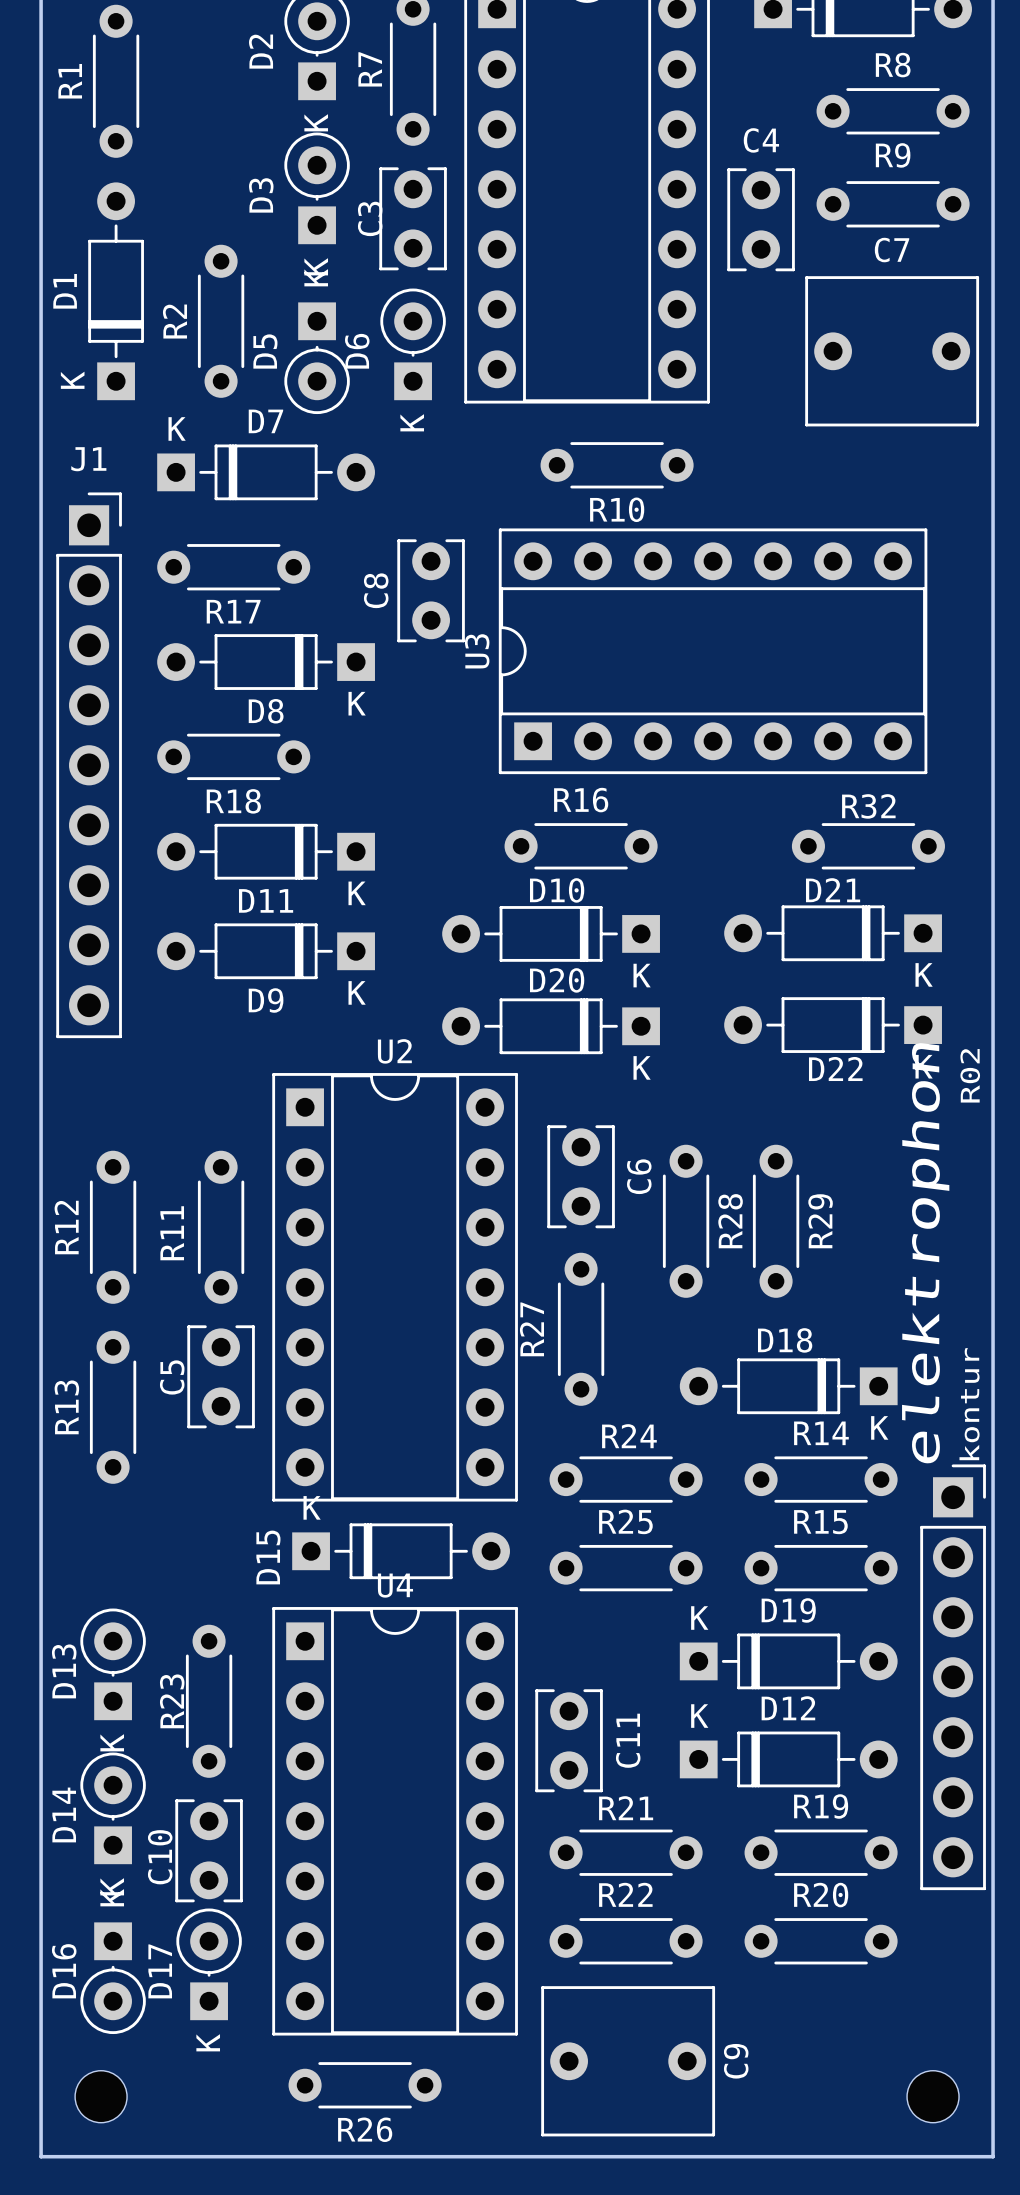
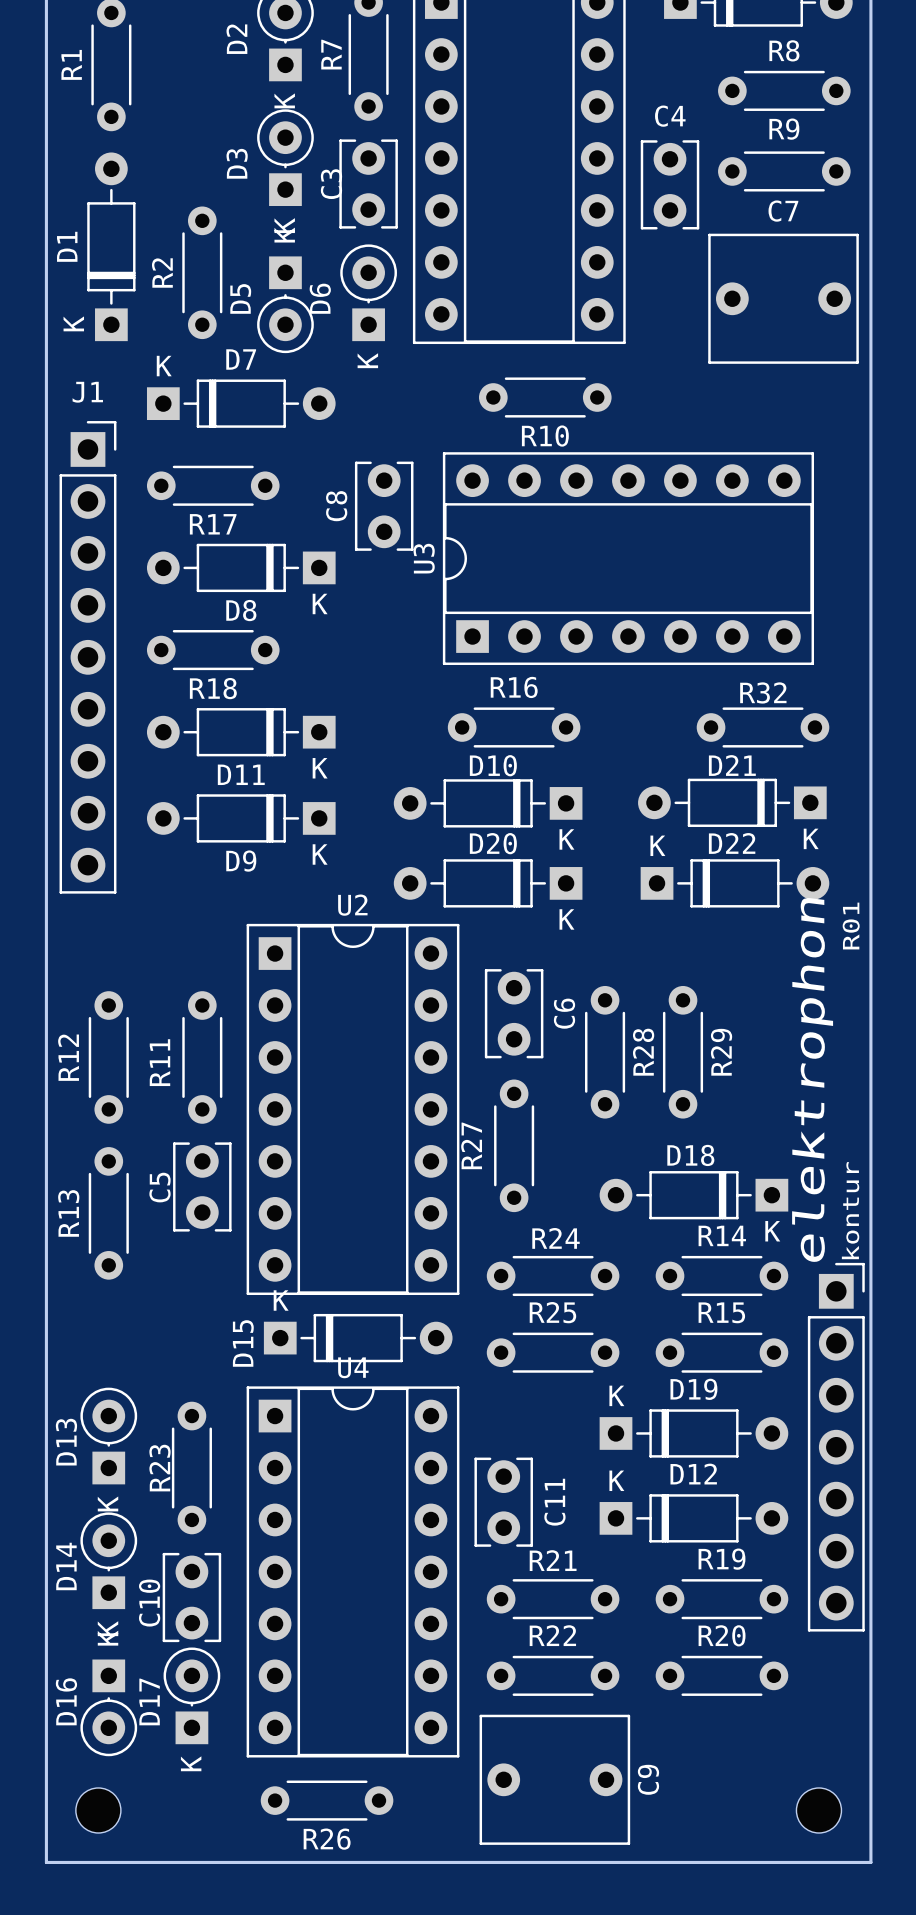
D22 rotation: 0° (833, 1025) -> 180° (734, 883)
drawing shape: [902, 1042, 981, 1465] -> [792, 897, 860, 1263]

